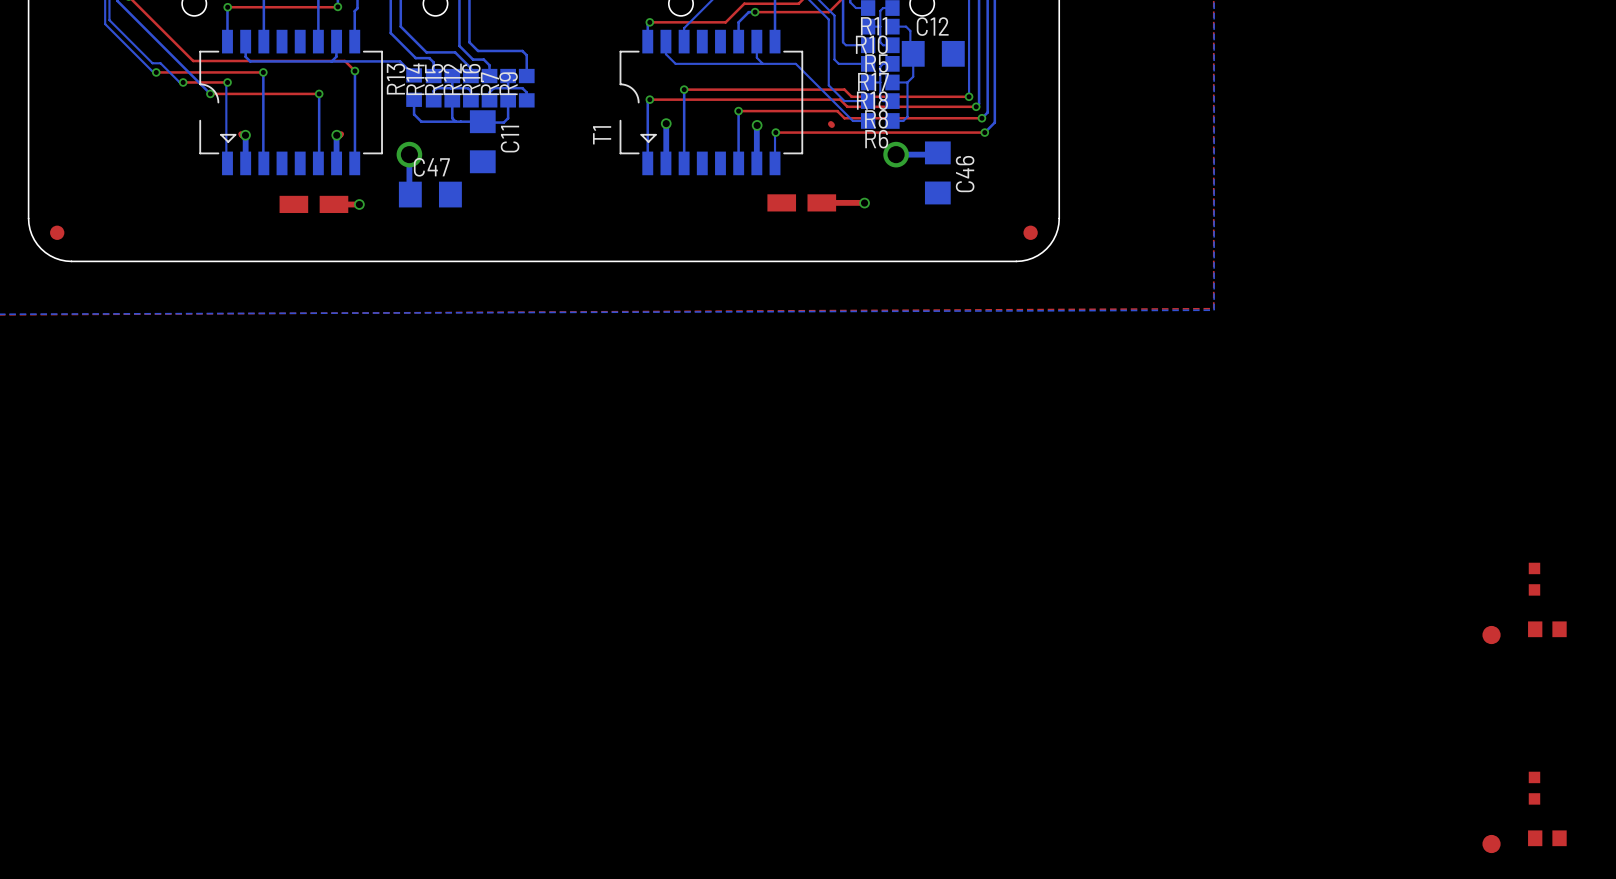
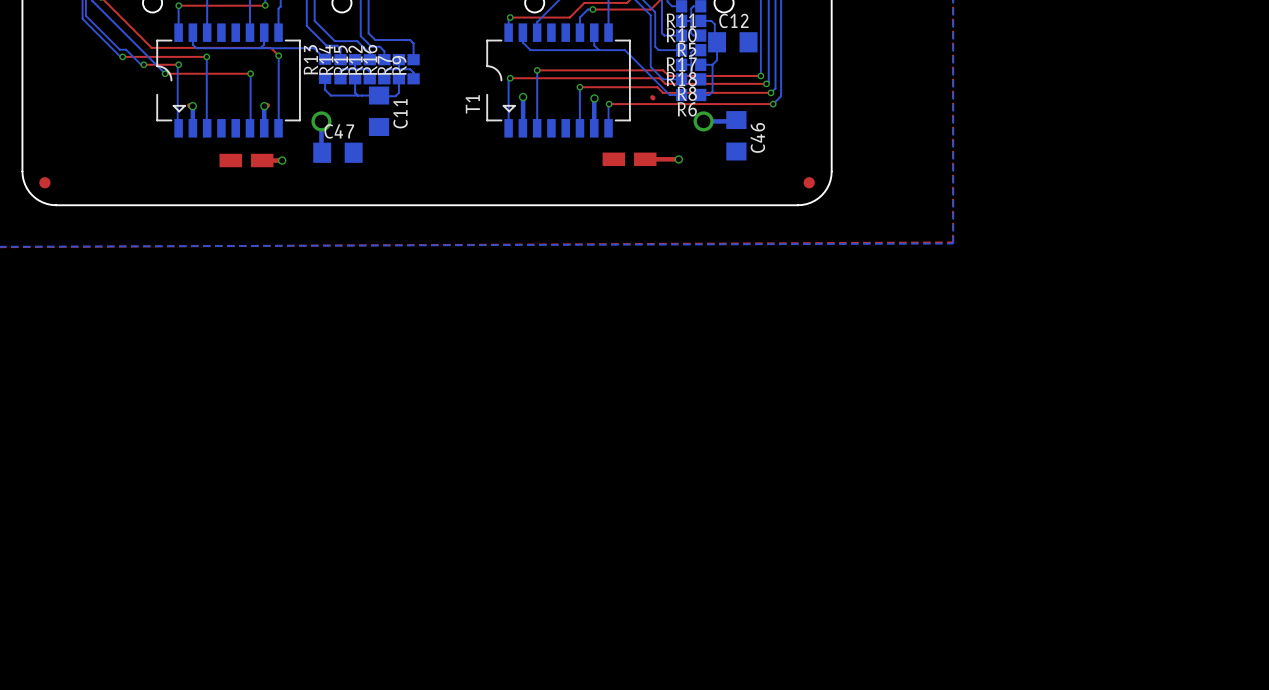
part: (1534, 579) -> none
part: (1547, 629) -> none
part: (1491, 635) -> none
part: (1534, 788) -> none
part: (1547, 838) -> none
part: (1491, 844) -> none

